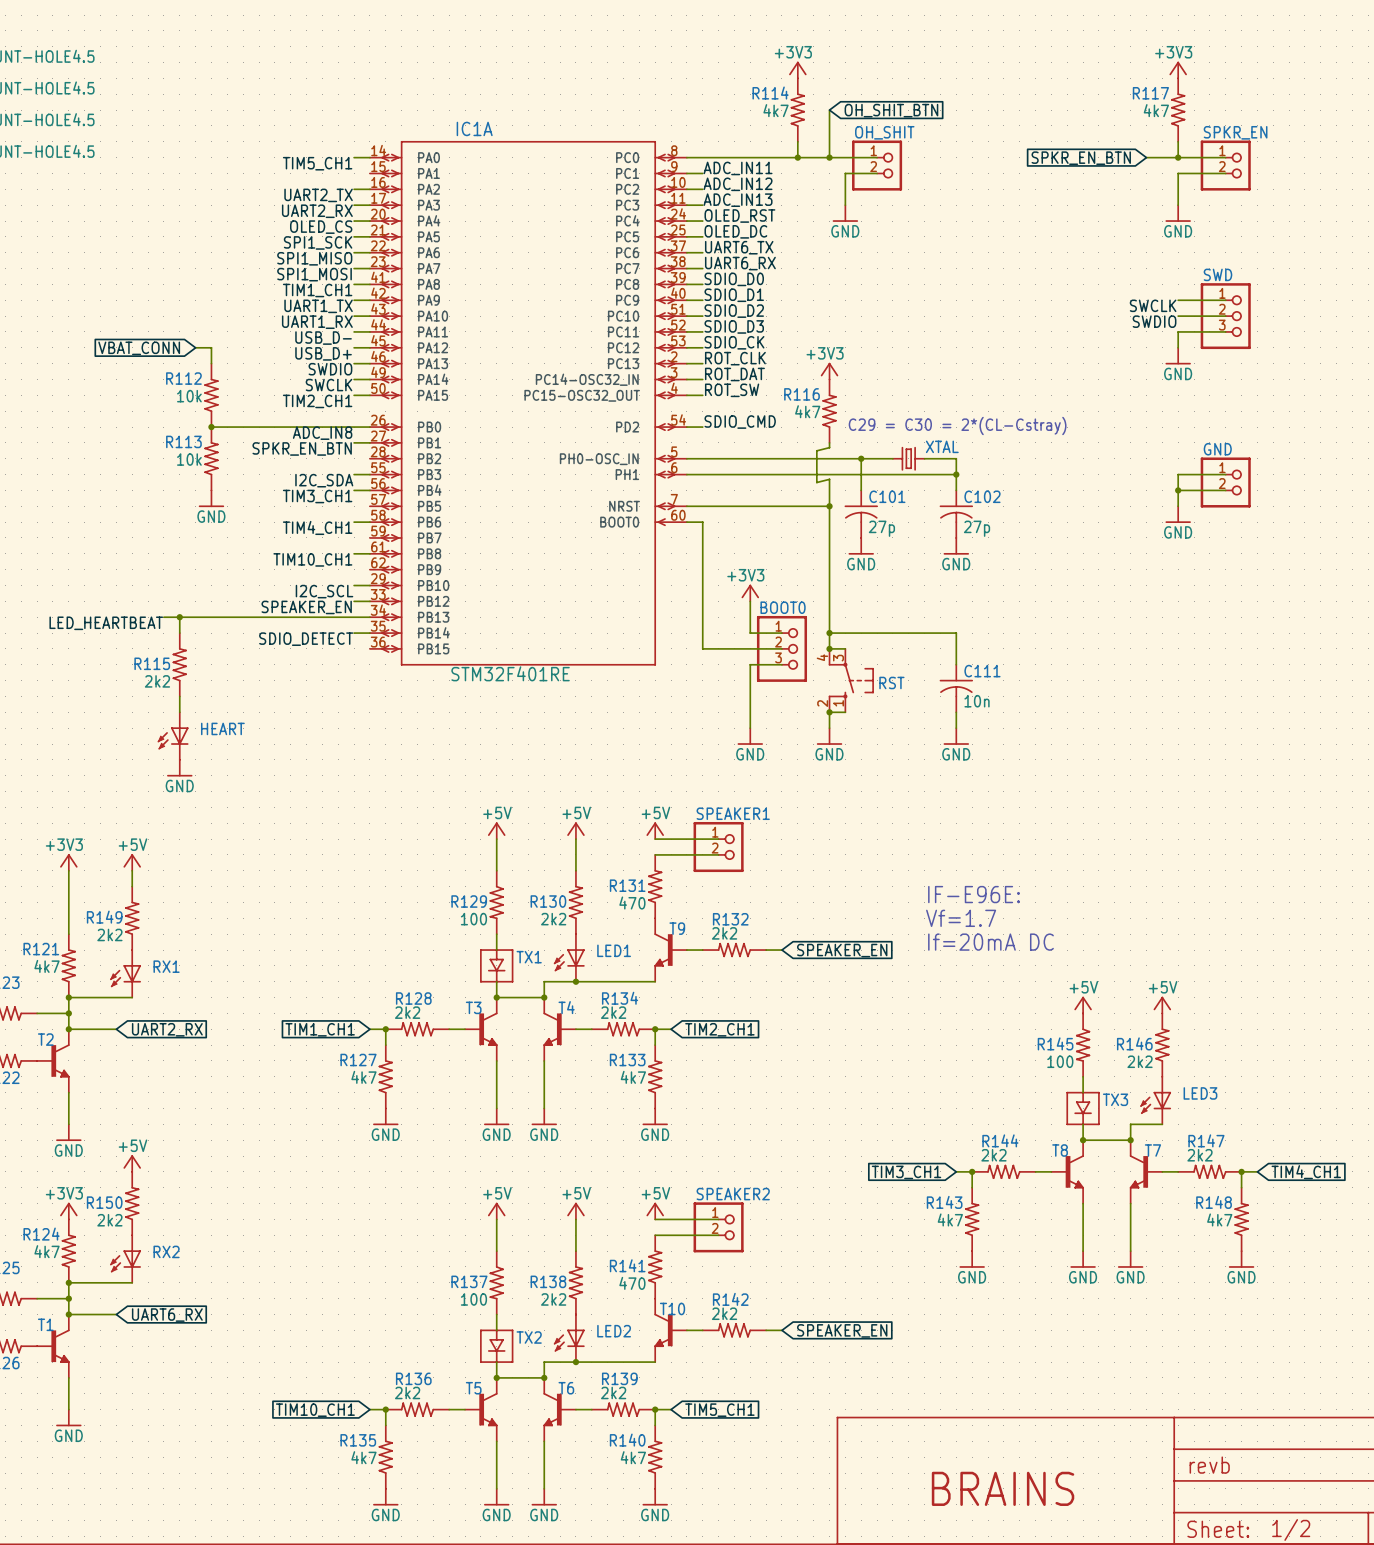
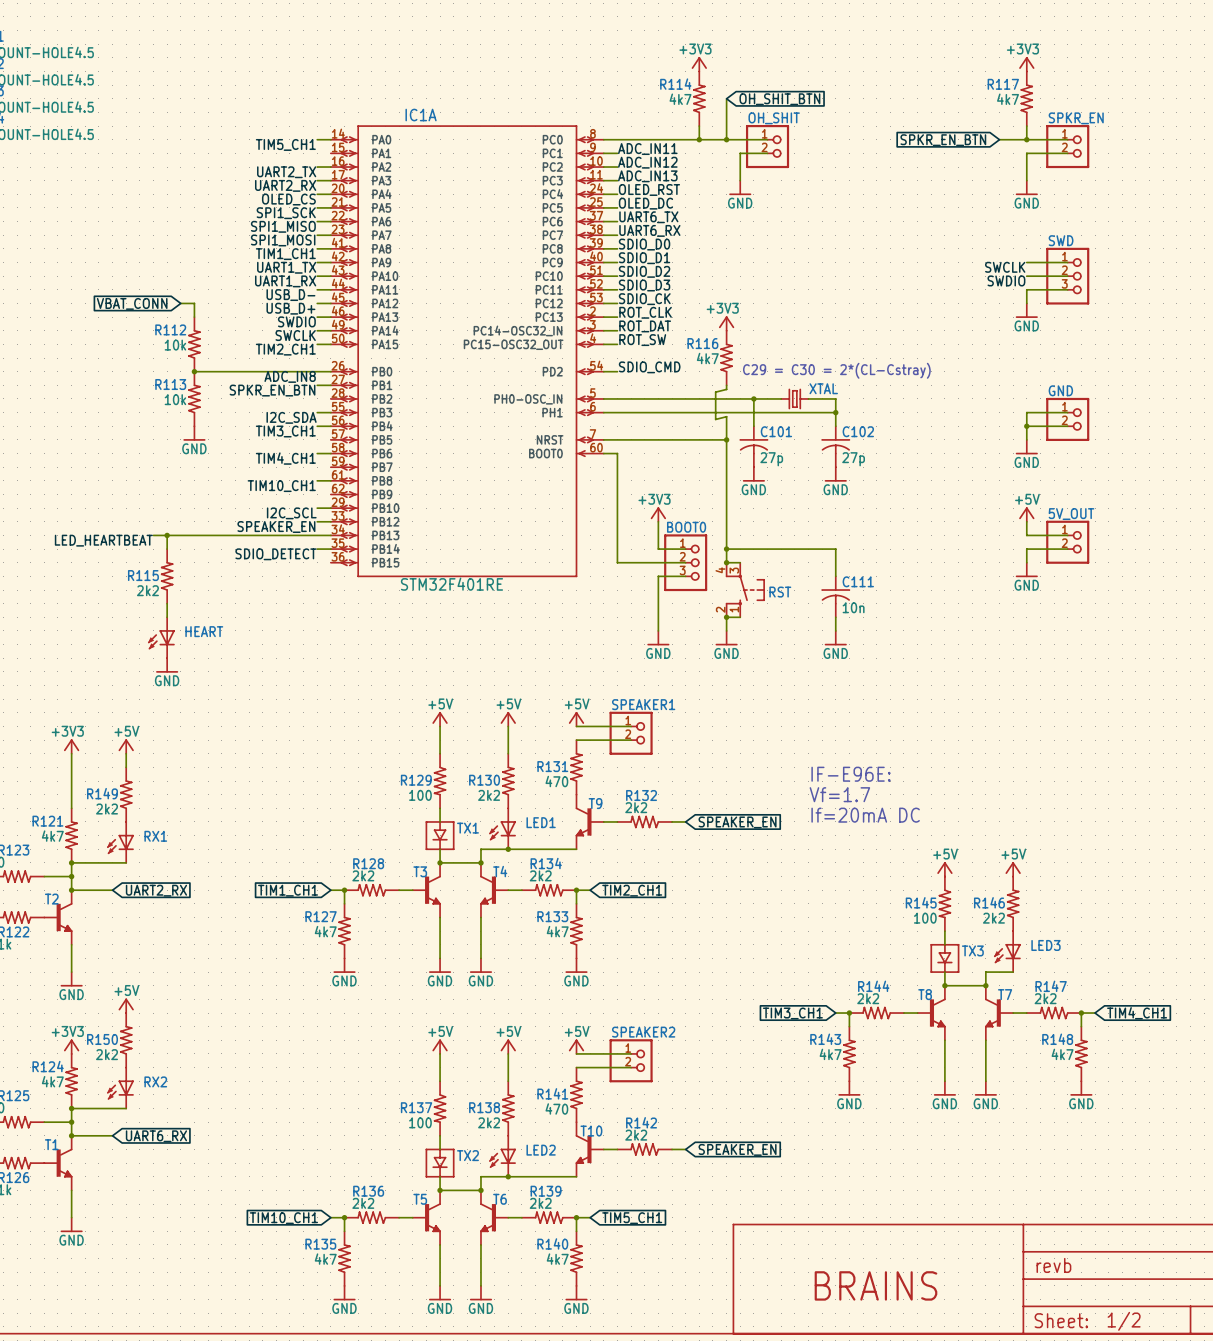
power symbol: none -> +5V (1026, 514)
wire: none -> (1026, 521) (1026, 535) (1067, 535)
5V_OUT: none -> (1067, 542)
wire: none -> (1067, 549) (1026, 549) (1026, 562)
power symbol: none -> GND (1026, 569)

